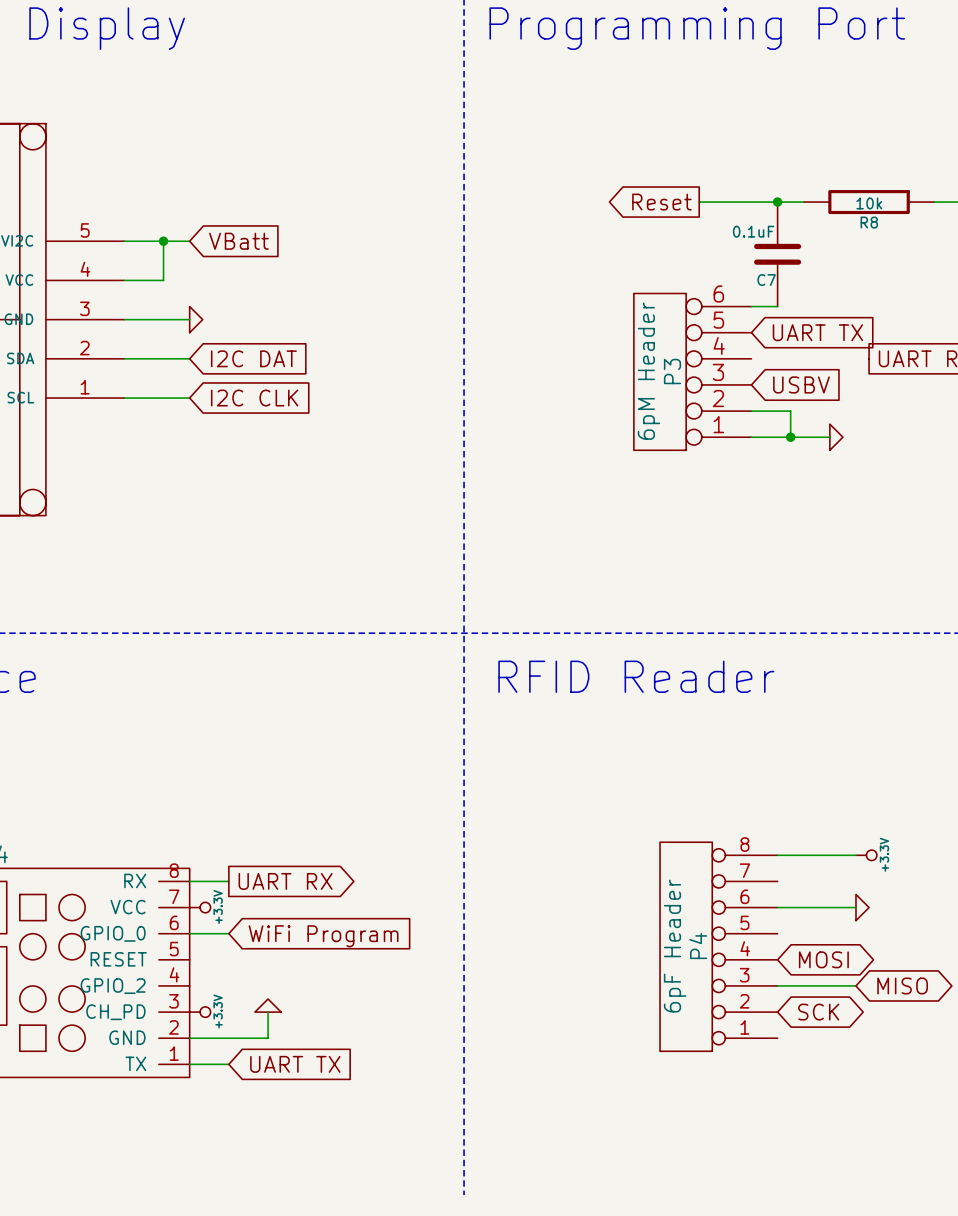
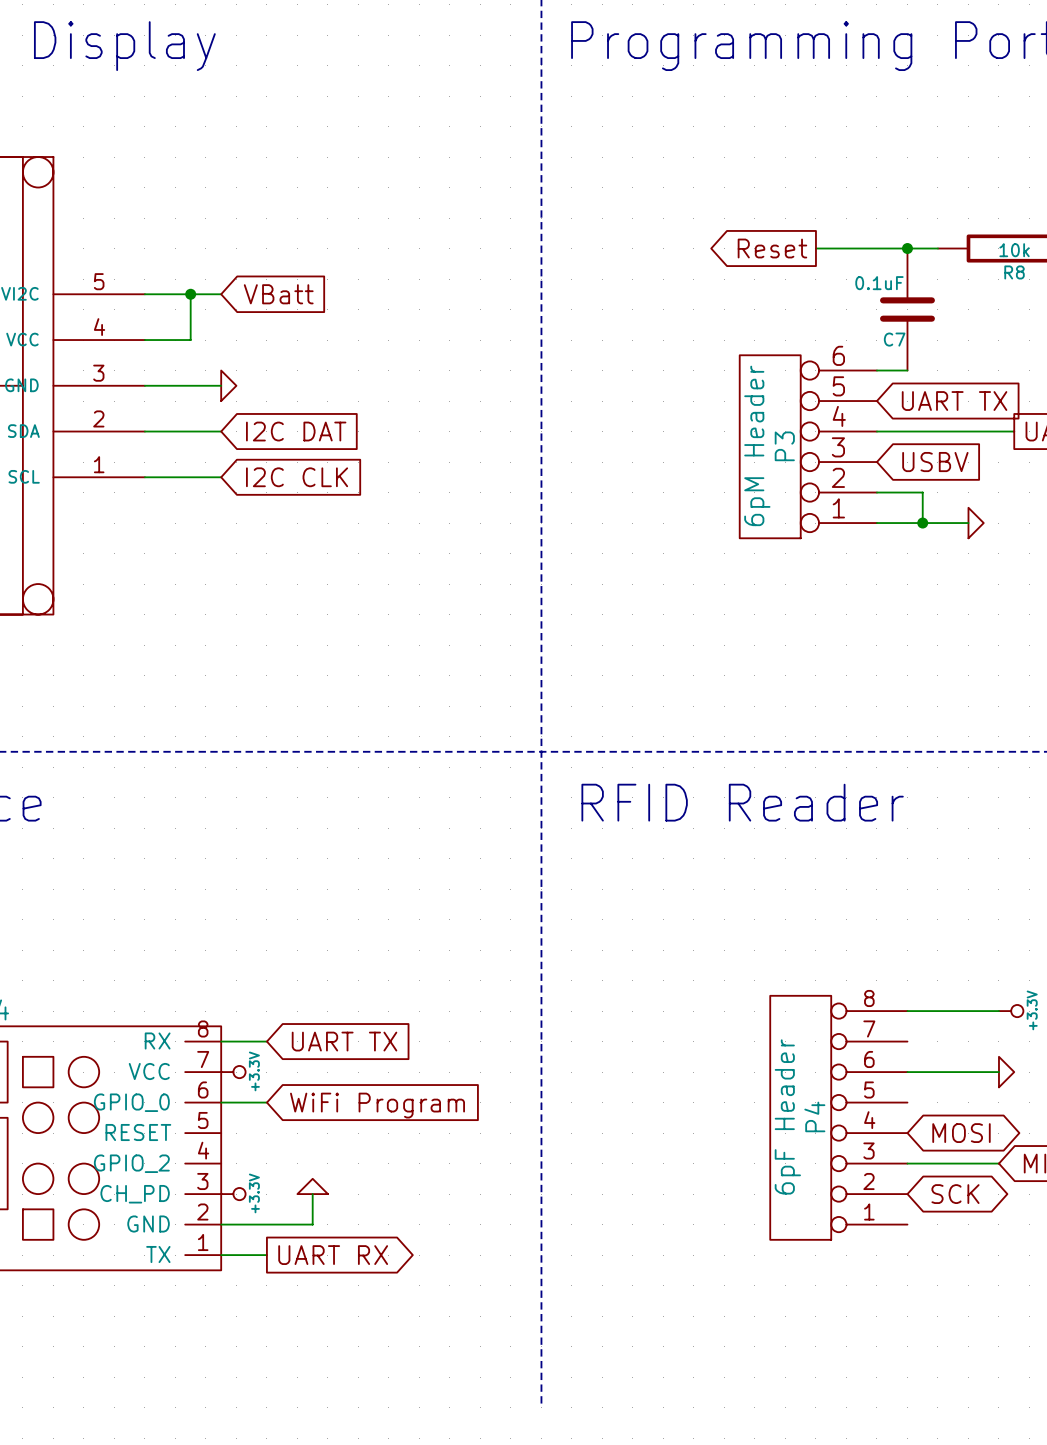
wire: none -> (876, 431) (1014, 431)
global label shape: output (285, 881) -> input (344, 1041)
global label: UART RX (285, 881) -> UART TX (344, 1041)
global label shape: input (295, 1064) -> output (333, 1255)
global label: UART TX (295, 1064) -> UART RX (333, 1255)

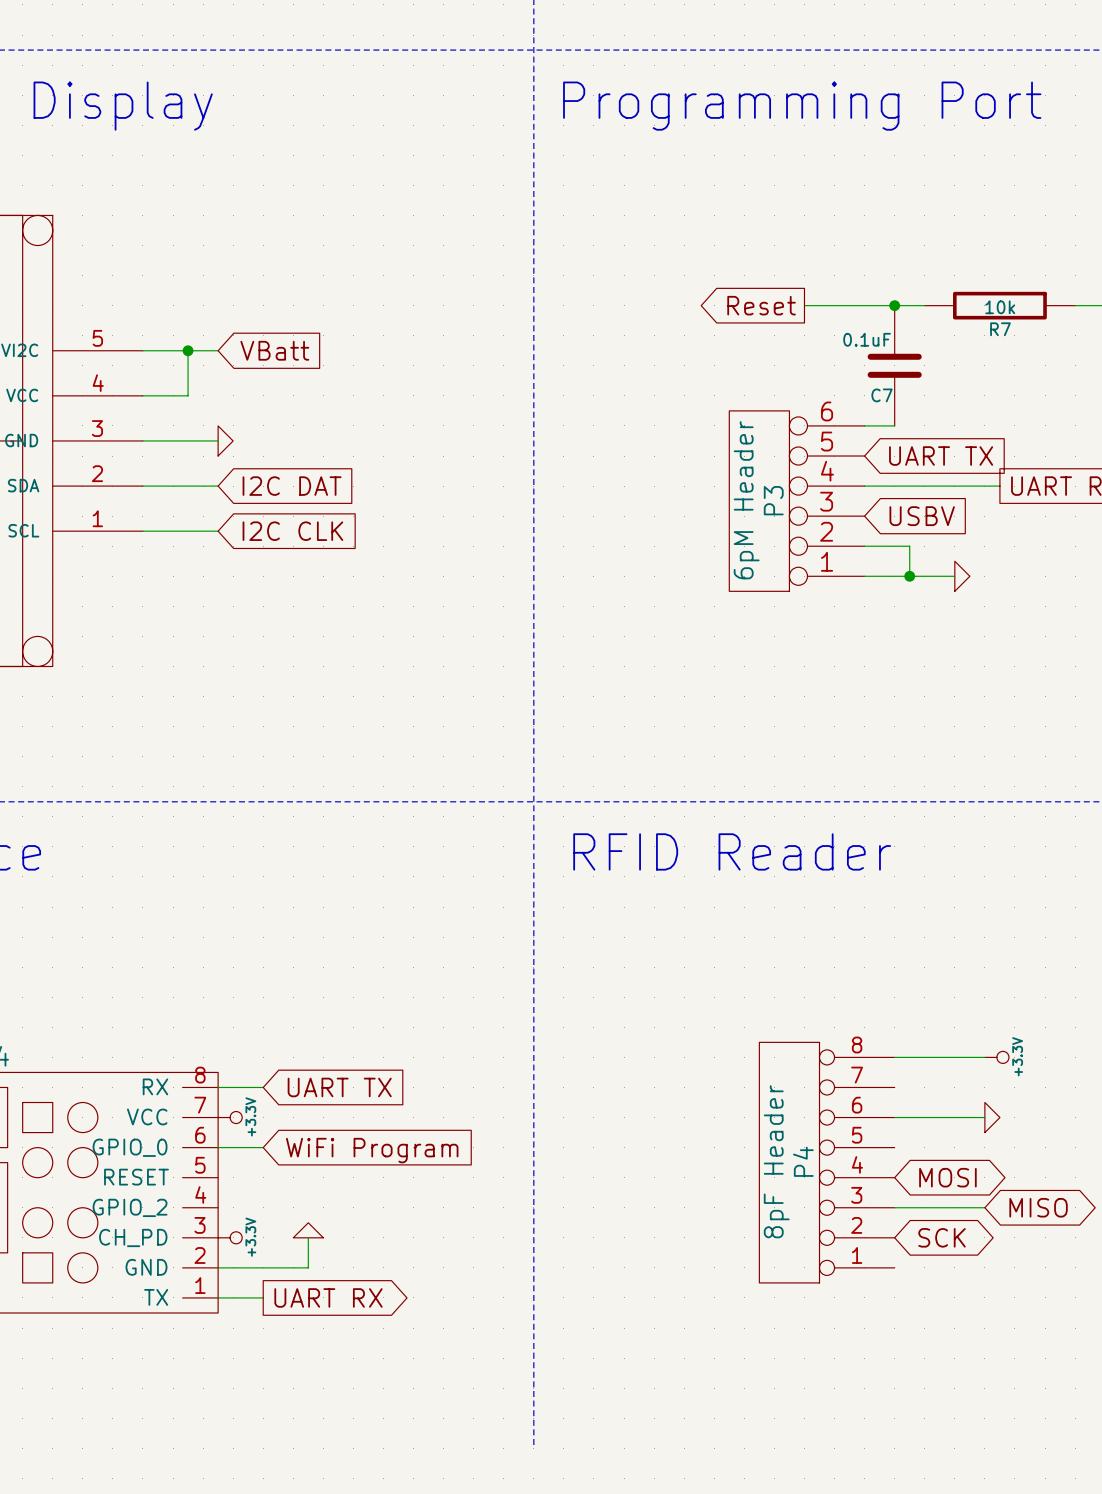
R8 name: R8 (1014, 272) -> R7 (1000, 329)
P4 value: 6pF Header (787, 1116) -> 8pF Header (776, 1161)

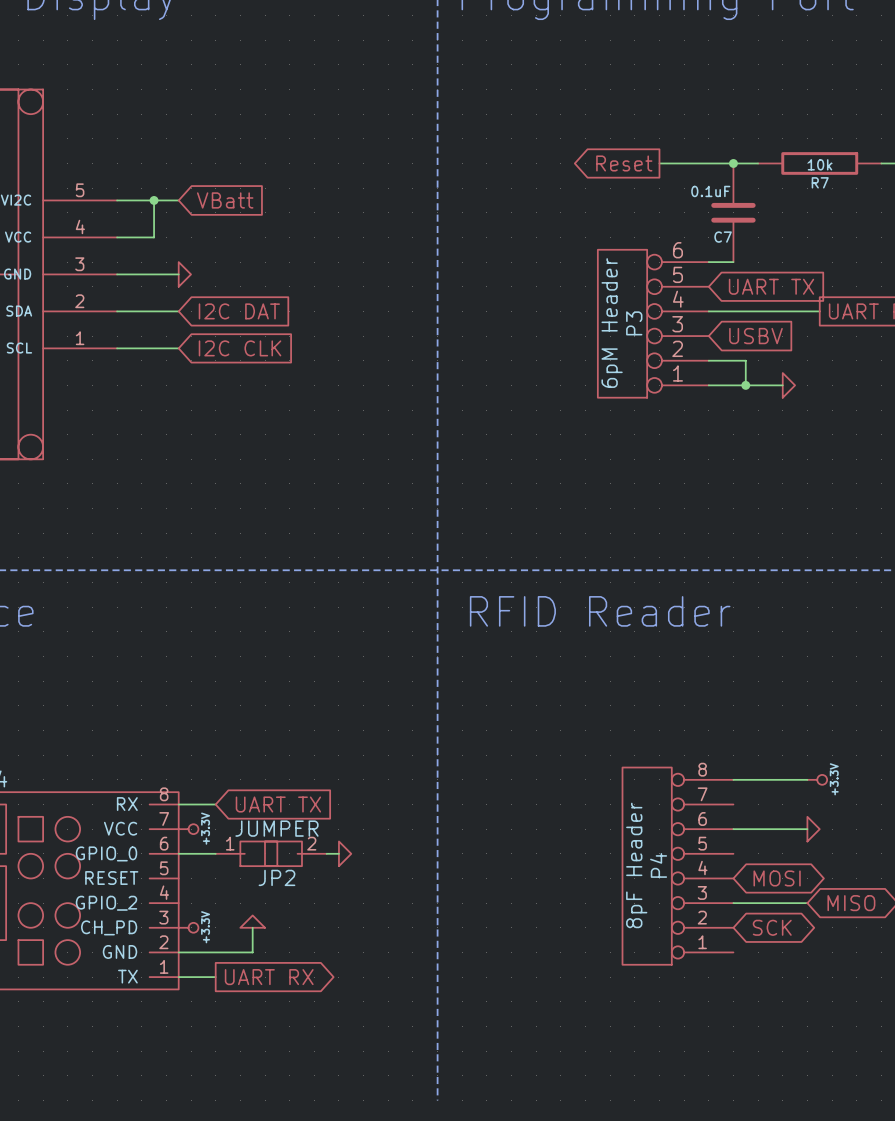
JP2: none -> JUMPER (271, 853)
wire: none -> (326, 853) (338, 853)
power symbol: none -> (345, 853)
global label: WiFi Program (372, 1150) -> none

